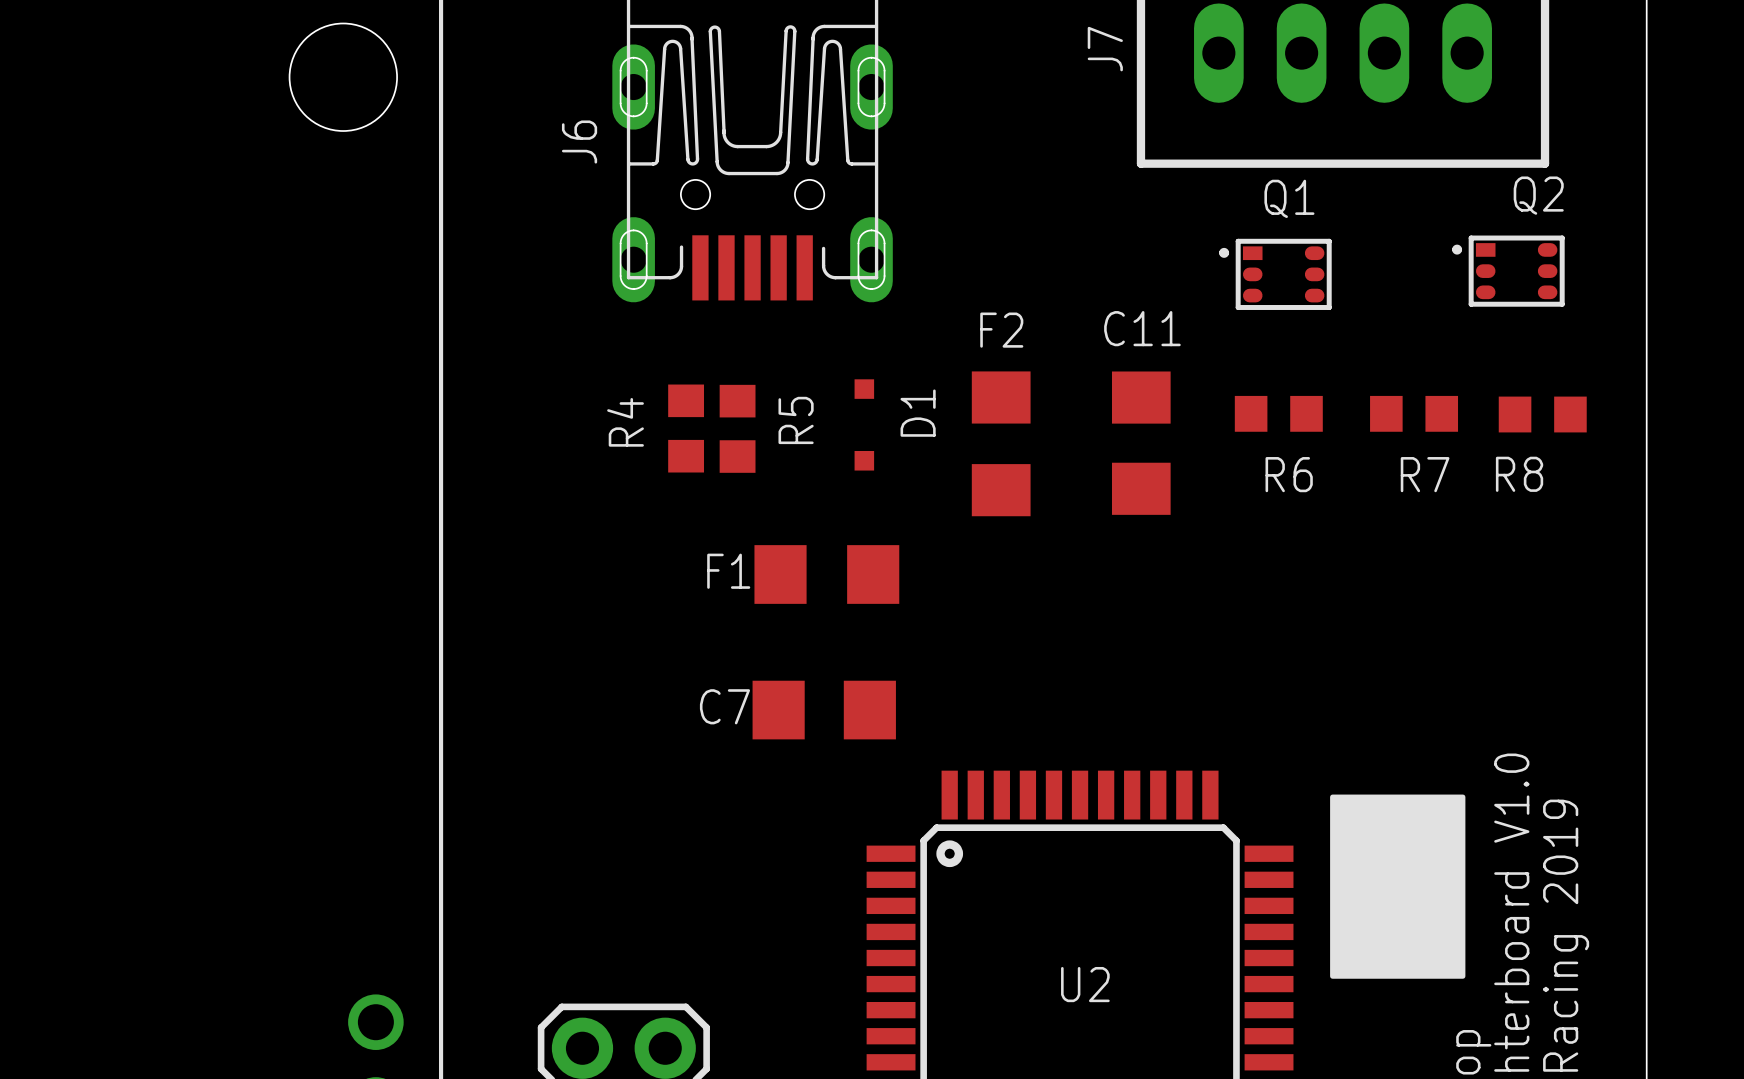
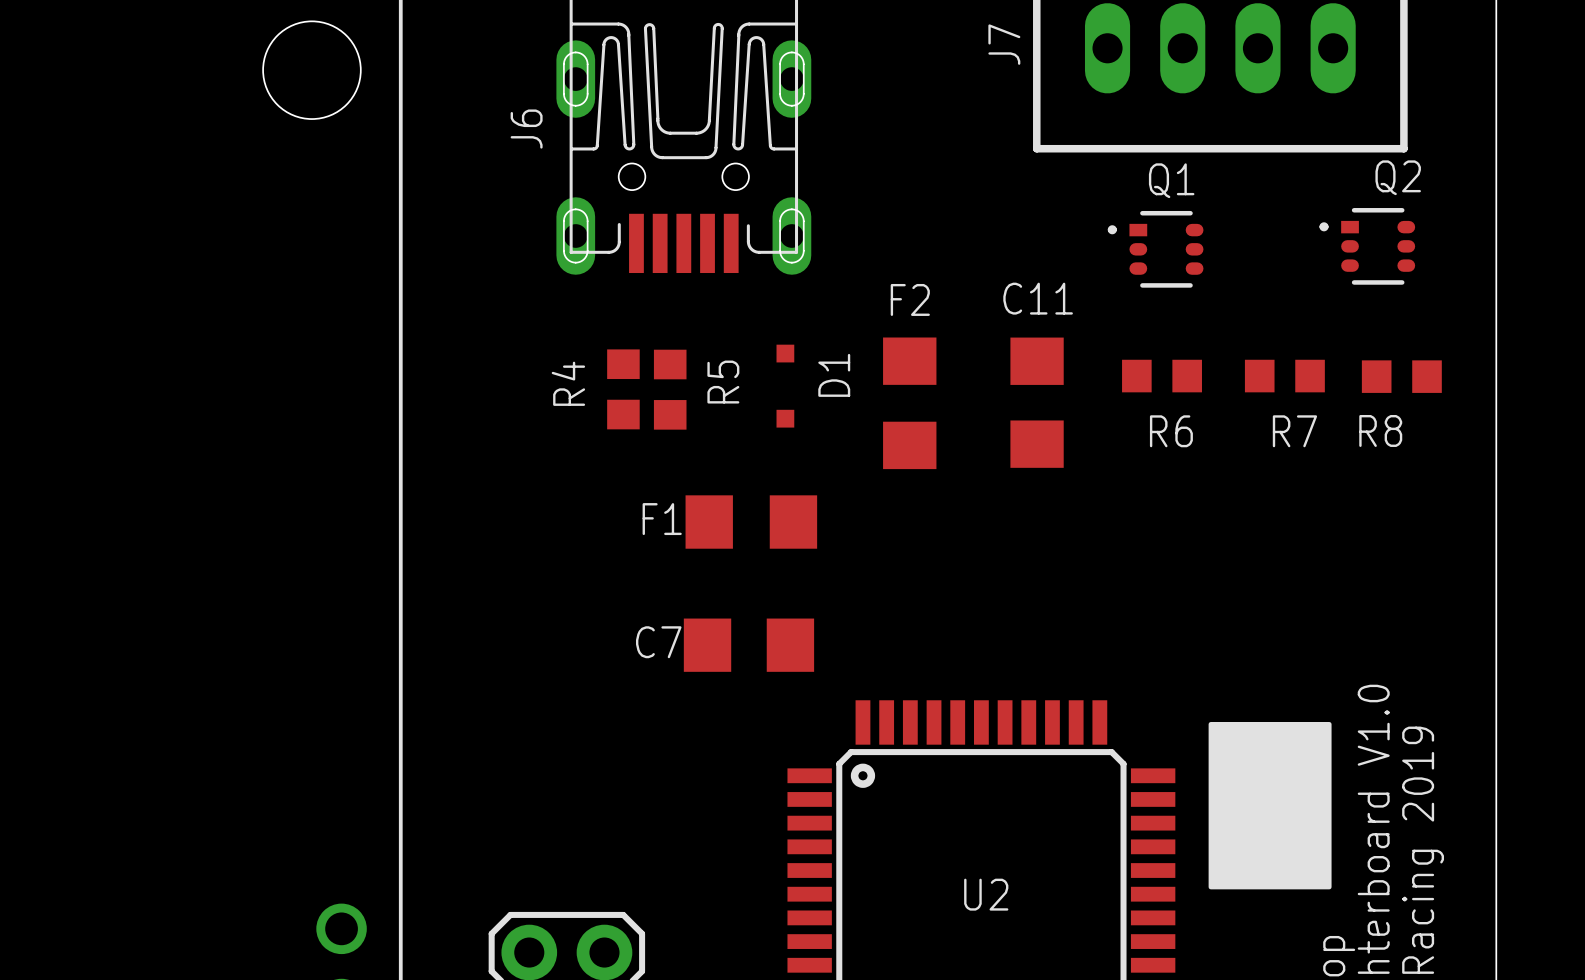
Q2 footprint: [1452, 235, 1565, 307] -> [1319, 208, 1416, 285]
Q1 footprint: [1219, 238, 1332, 310] -> [1107, 210, 1204, 288]

